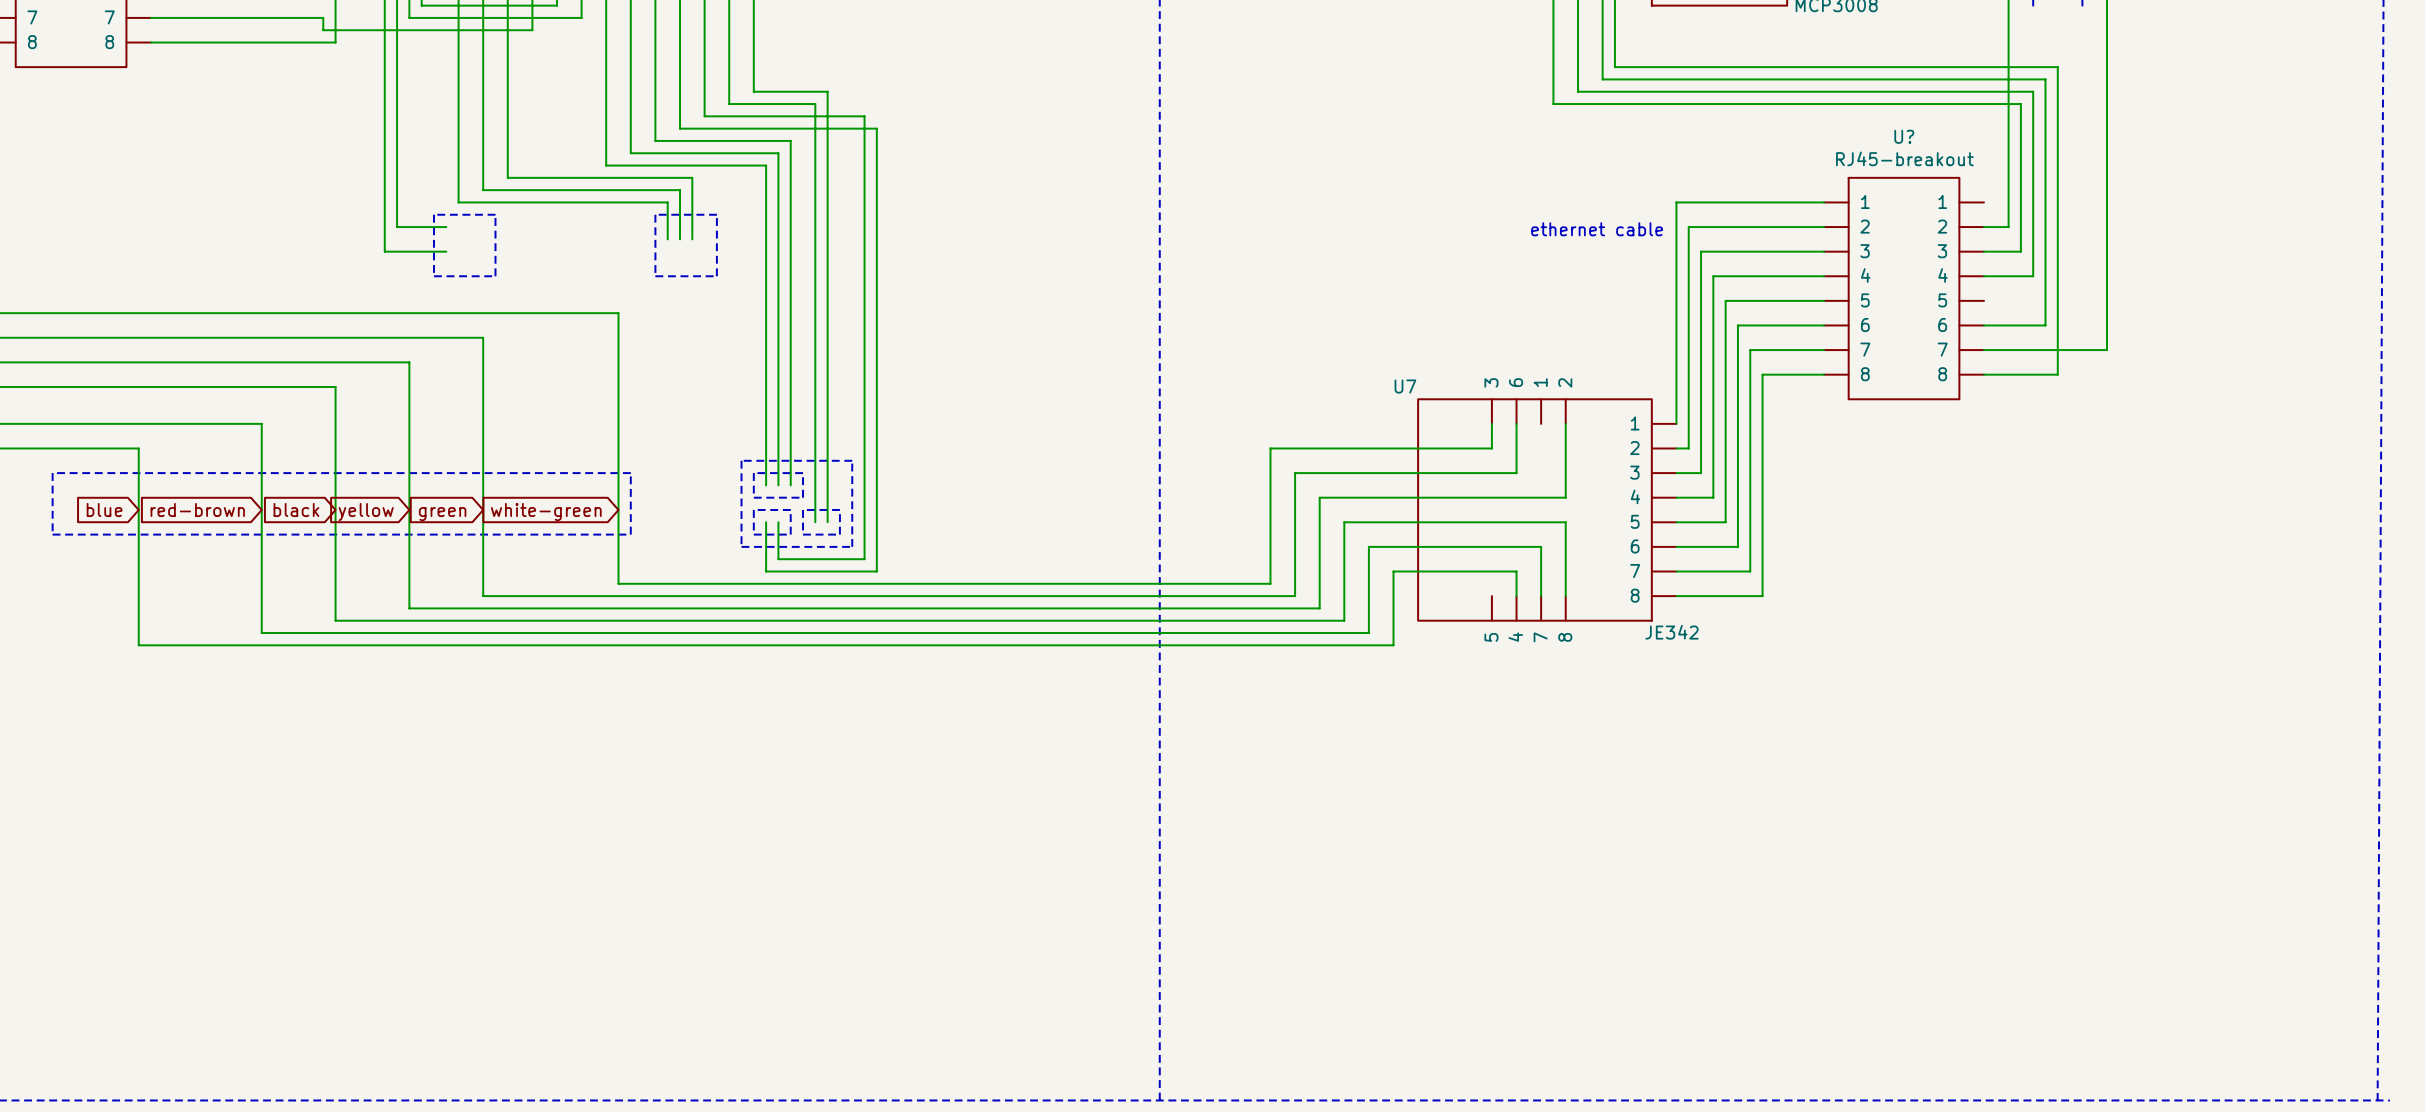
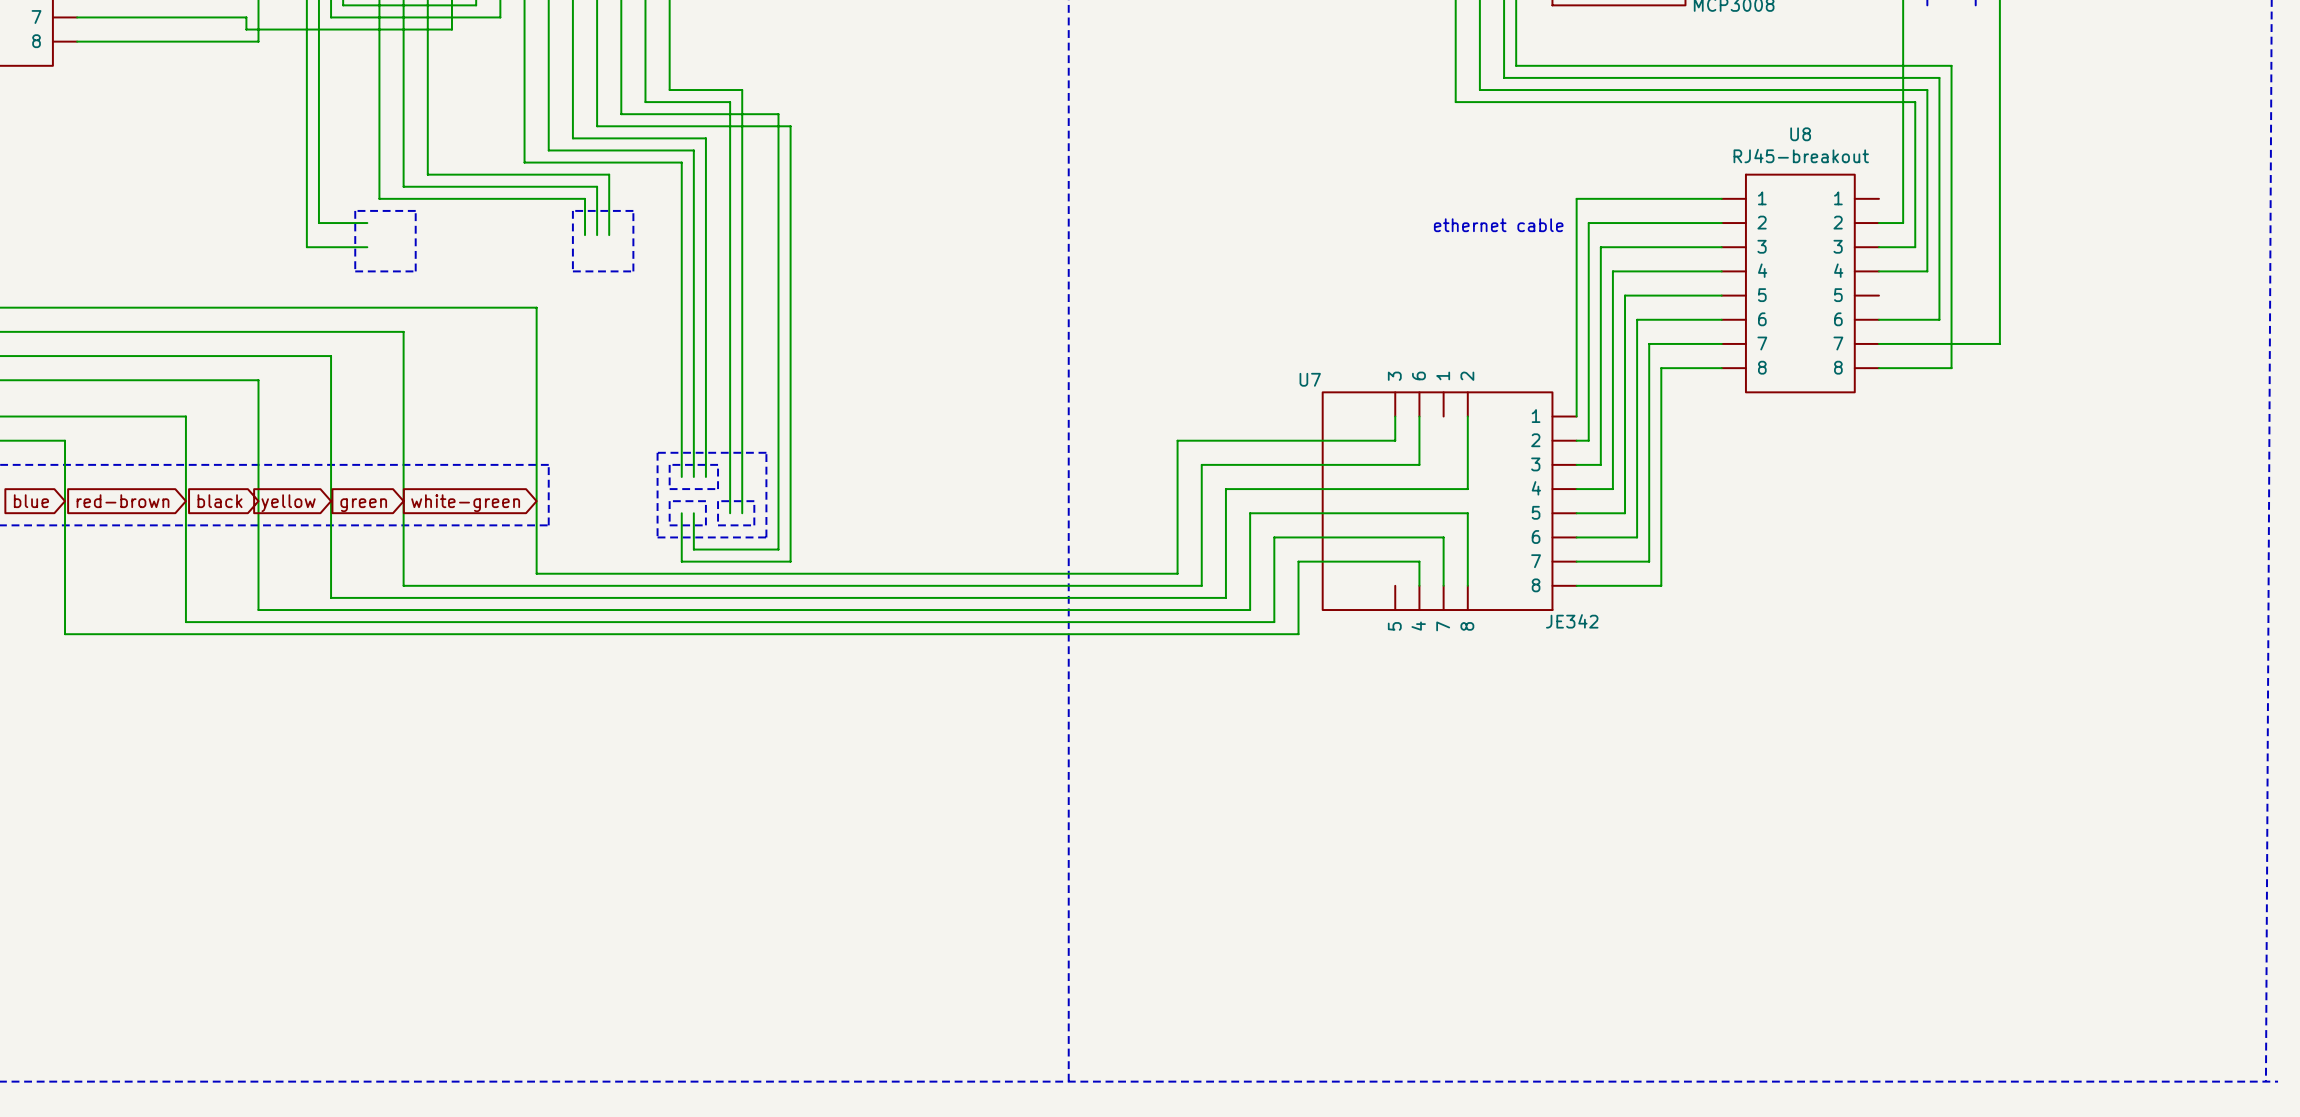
U? name: U? (1904, 136) -> U8 (1800, 134)

